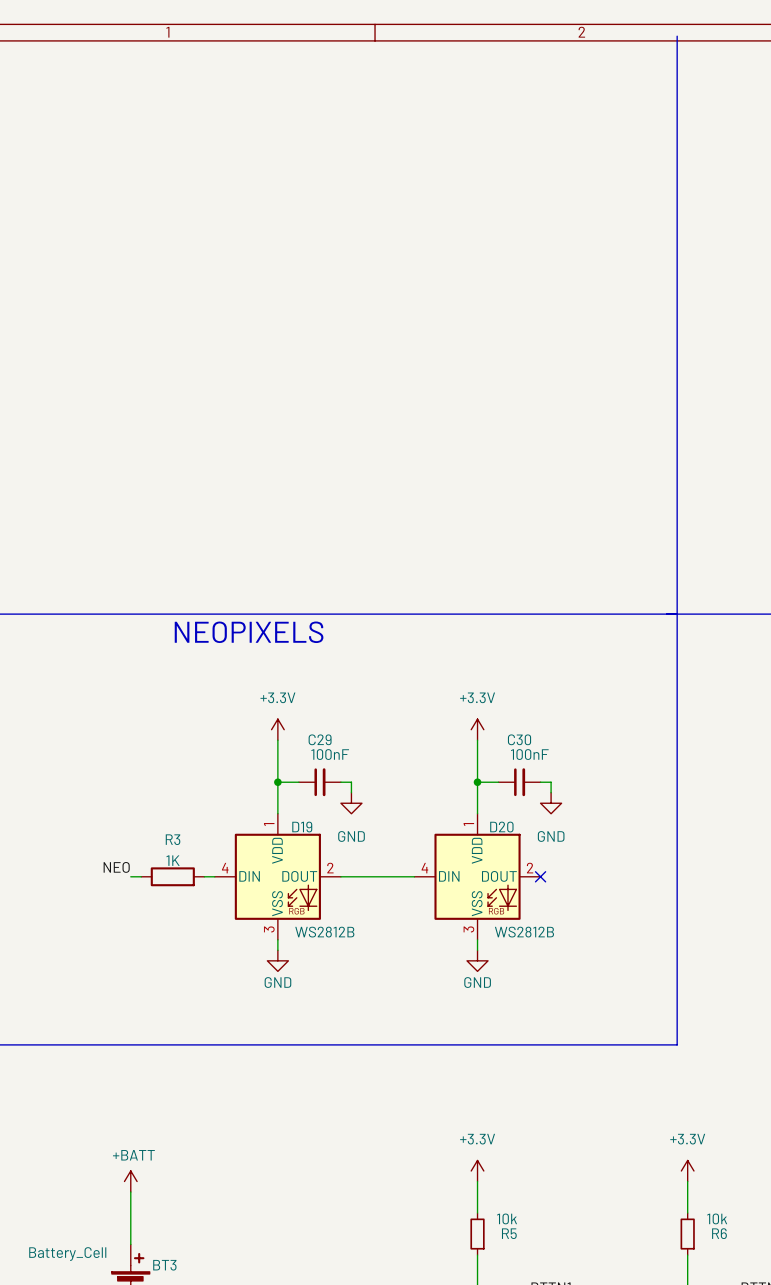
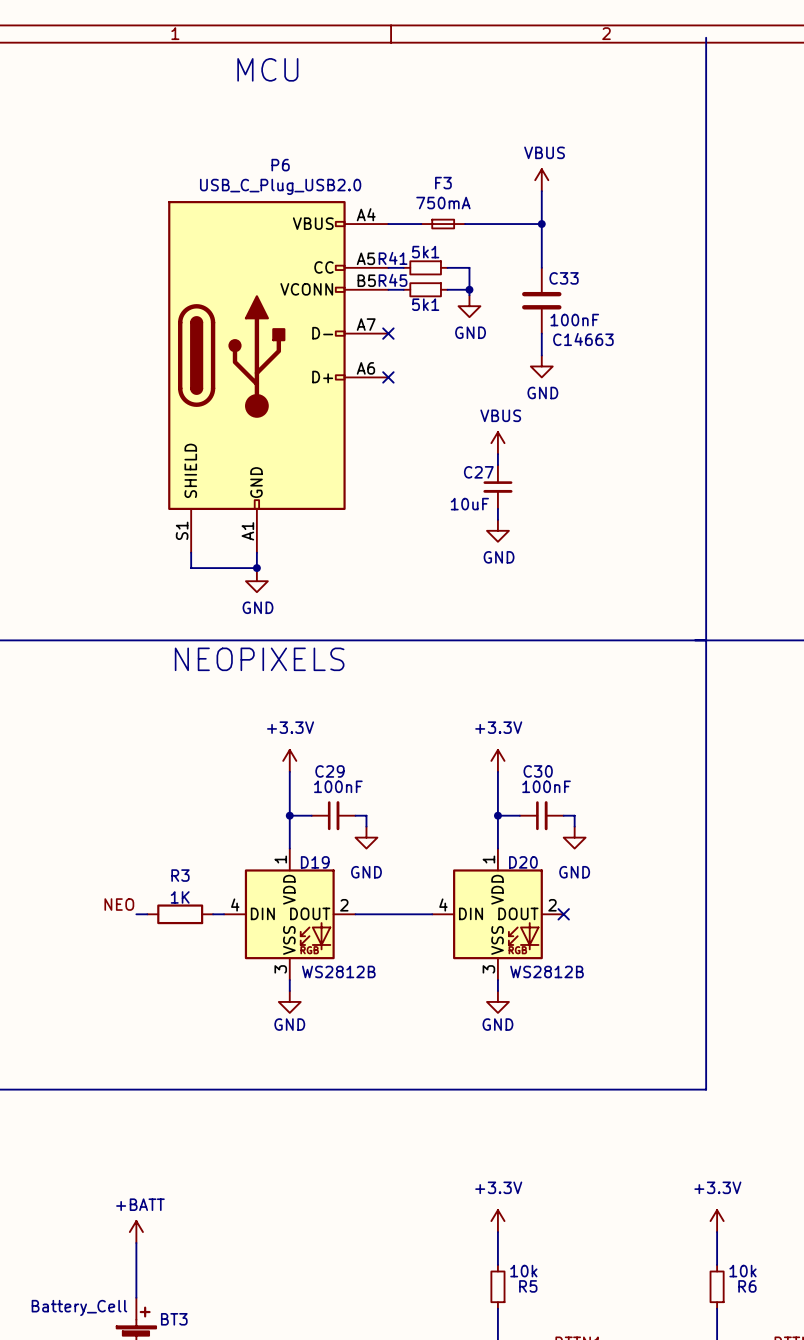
text: none -> MCU (267, 69)
power symbol: none -> VBUS (541, 180)
wire: none -> (541, 191) (541, 267)
wire: none -> (388, 224) (421, 224)
F3: none -> 750mA (443, 224)
wire: none -> (465, 224) (541, 224)
junction: none -> (541, 224)
wire: none -> (388, 267) (403, 267)
R41: none -> 5k1 (425, 267)
wire: none -> (447, 267) (469, 267) (469, 295)
wire: none -> (388, 289) (403, 289)
R45: none -> 5k1 (425, 289)
wire: none -> (447, 289) (469, 289)
junction: none -> (469, 289)
C33: none -> 100nF (541, 300)
power symbol: none -> GND (469, 306)
no-connect mark: none -> (388, 333)
wire: none -> (541, 333) (541, 355)
power symbol: none -> GND (541, 366)
P6: none -> USB_C_Plug_USB2.0 (278, 376)
no-connect mark: none -> (388, 377)
power symbol: none -> VBUS (497, 443)
wire: none -> (497, 454) (497, 465)
C27: none -> 10uF (497, 486)
wire: none -> (497, 508) (497, 519)
power symbol: none -> GND (497, 530)
wire: none -> (191, 552) (191, 568) (256, 568)
wire: none -> (256, 552) (256, 570)
junction: none -> (256, 568)
power symbol: none -> GND (256, 581)

